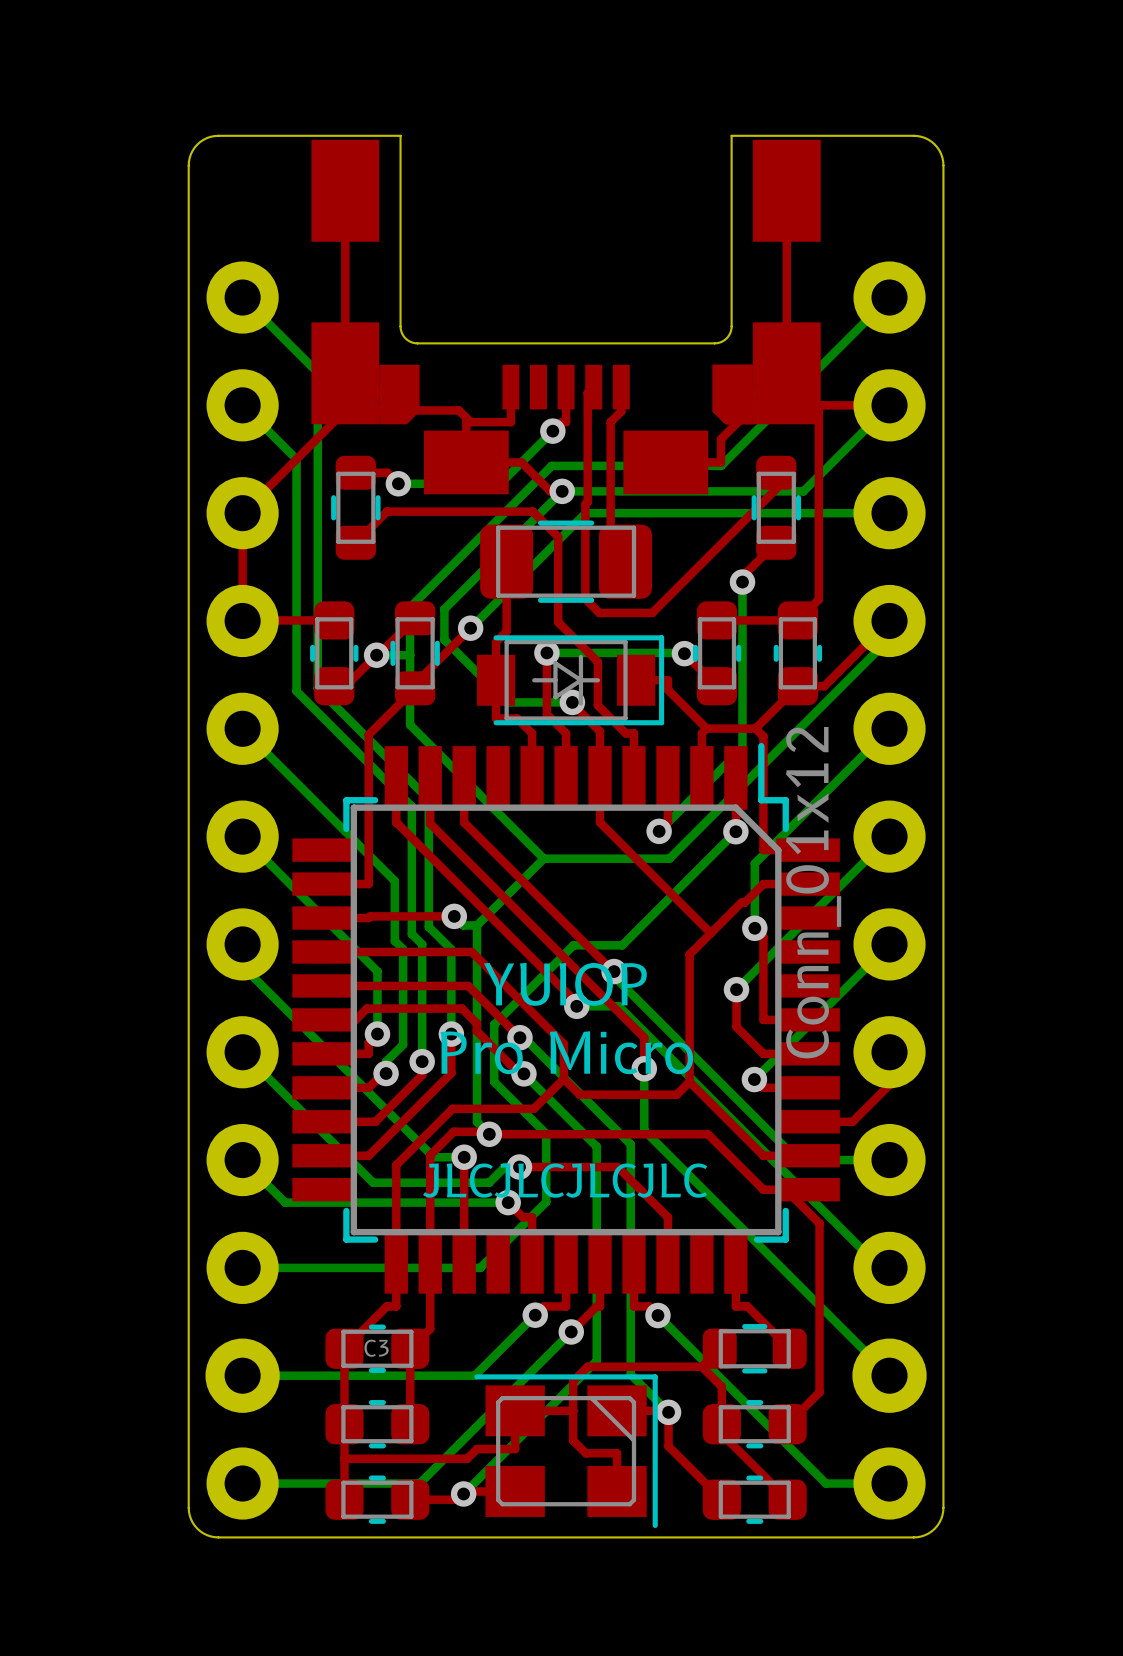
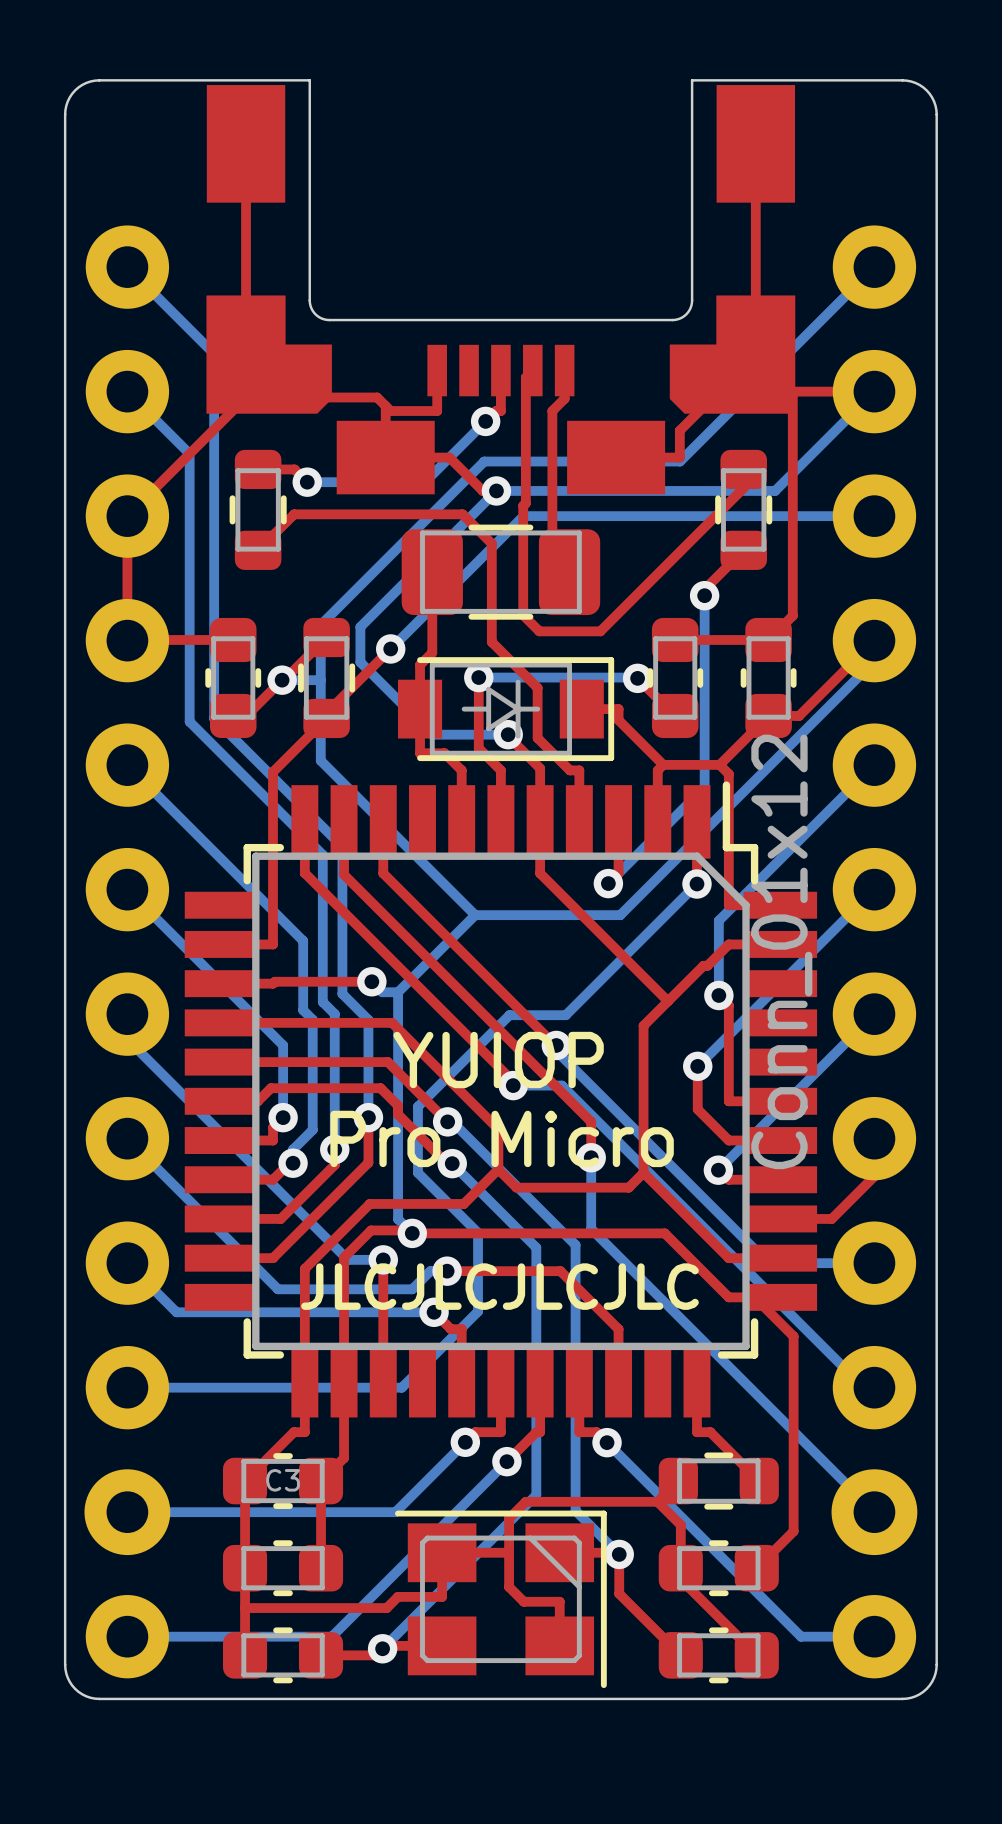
part footprint: [311, 139, 821, 495] -> [206, 85, 796, 495]

